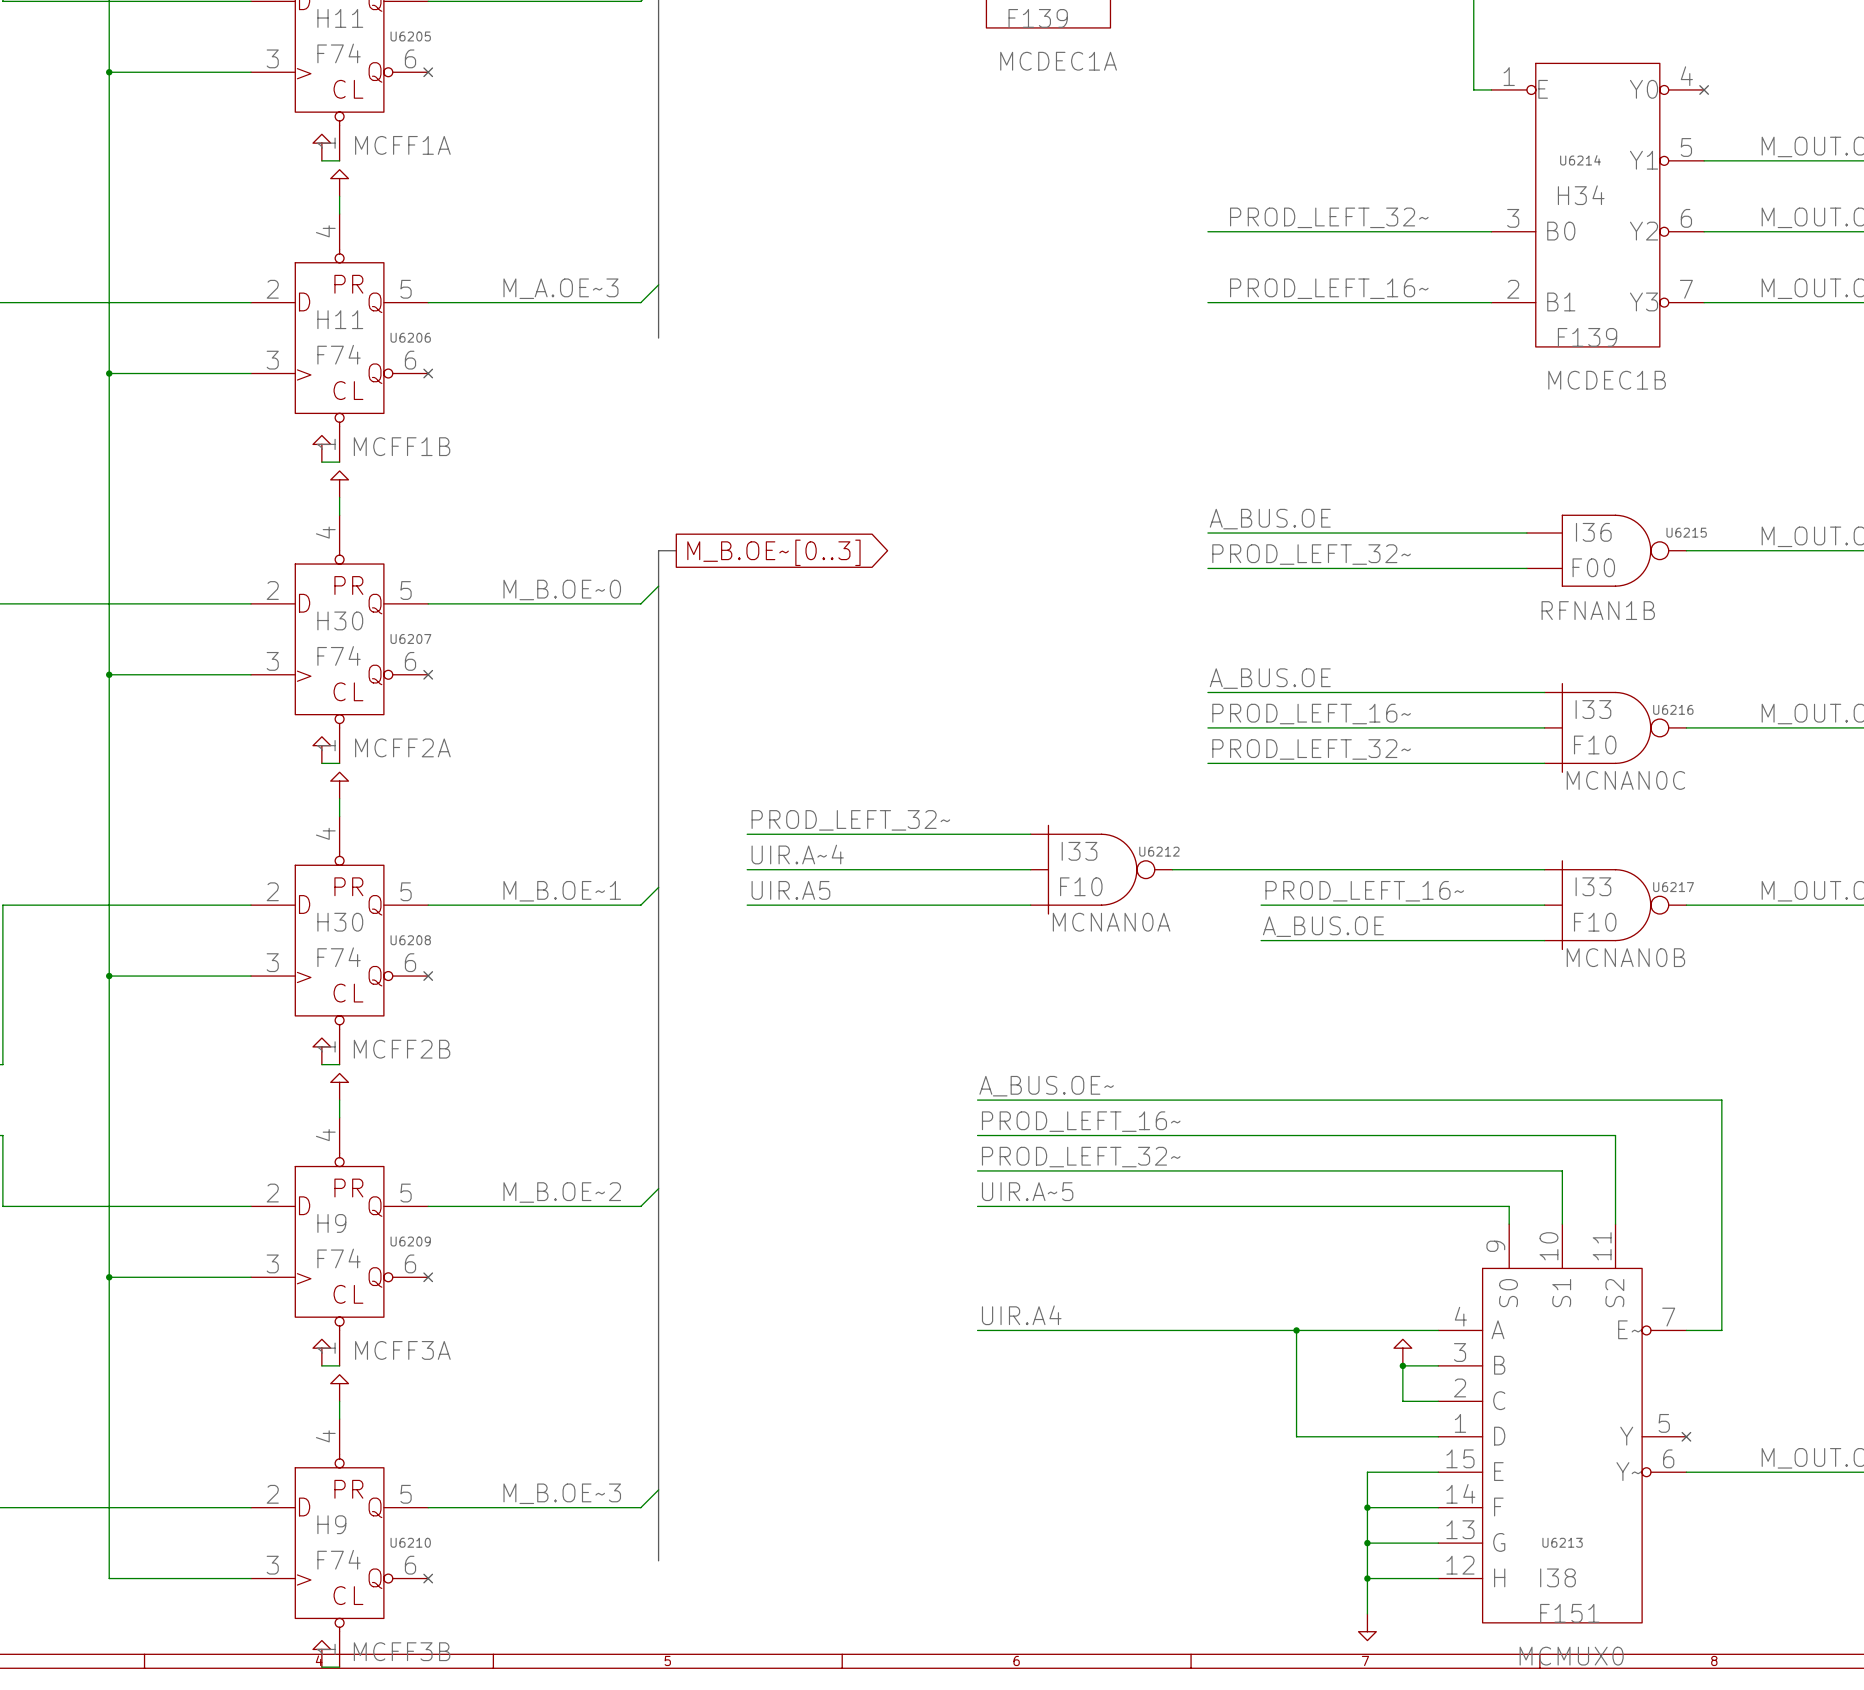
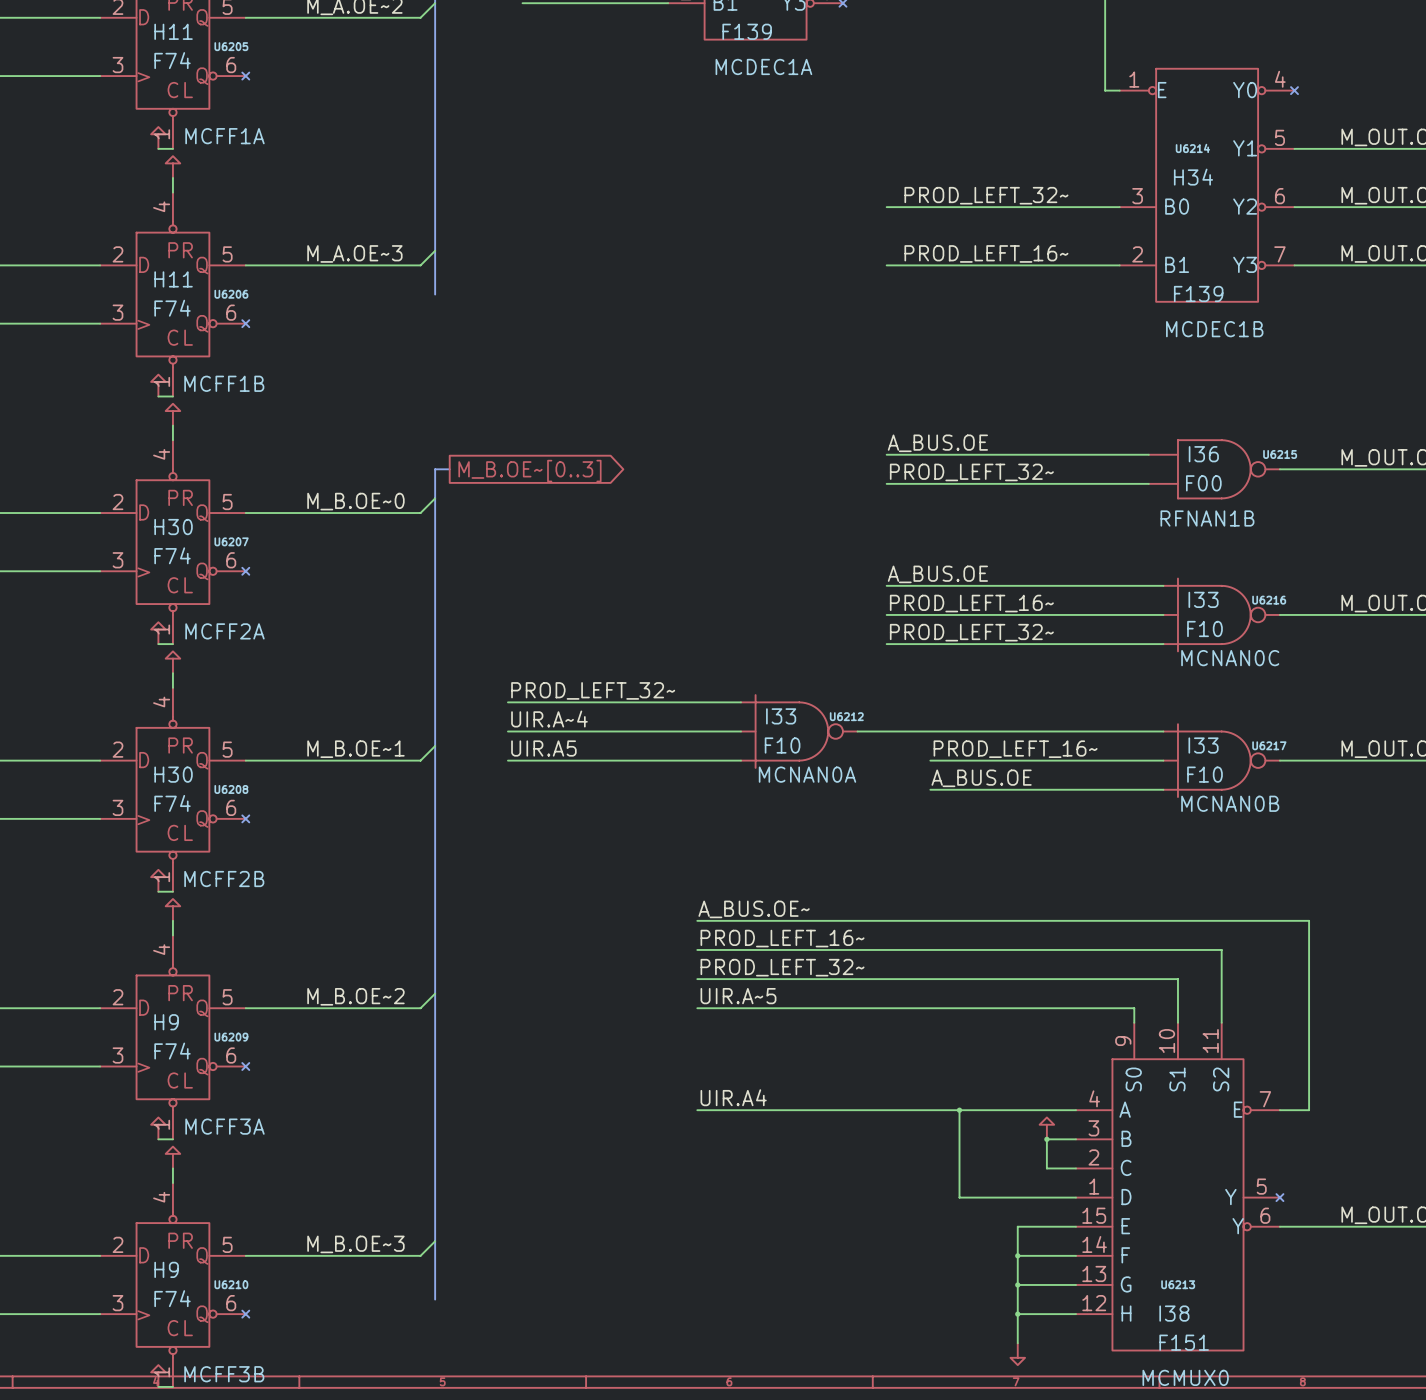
U6213 pin name: E~ (1629, 1329) -> E (1238, 1109)
U6213 pin name: Y~ (1628, 1471) -> Y (1238, 1226)

